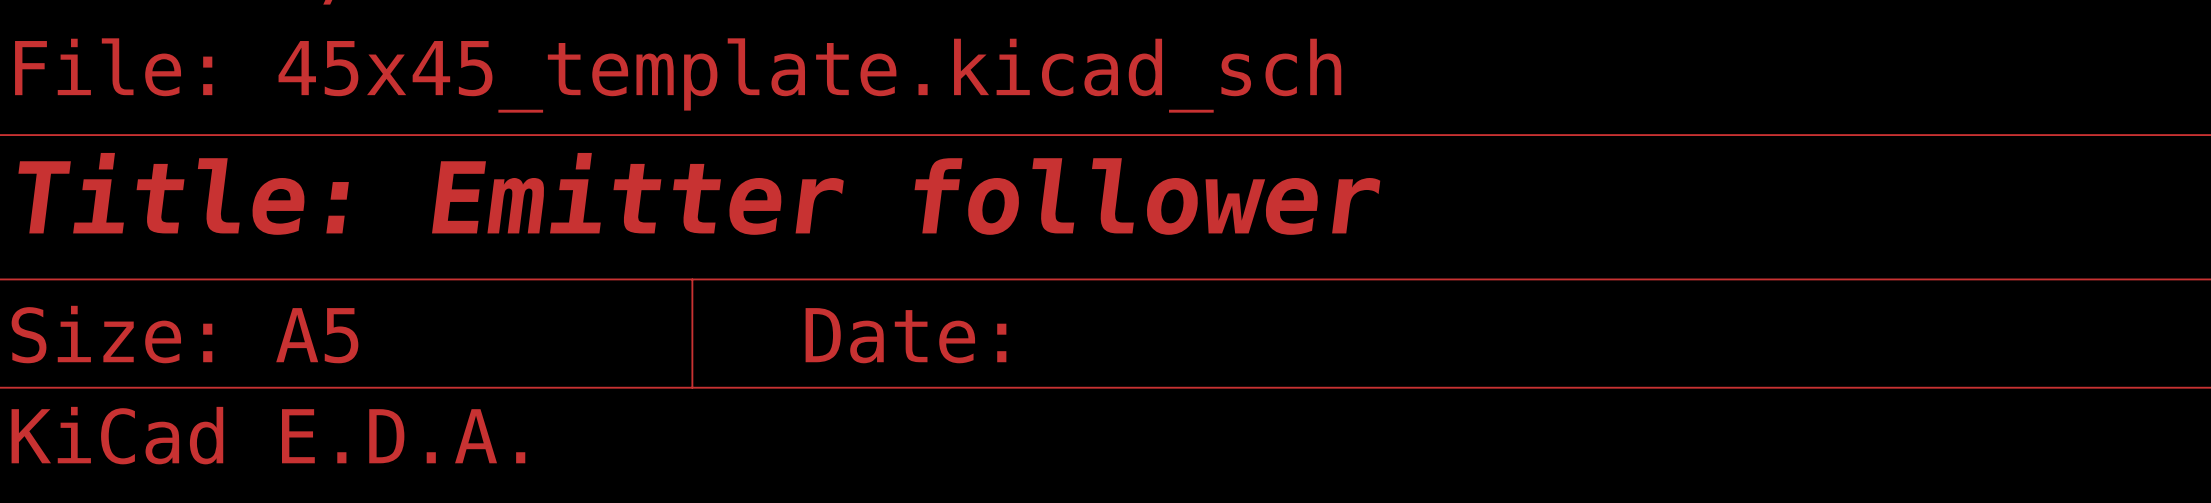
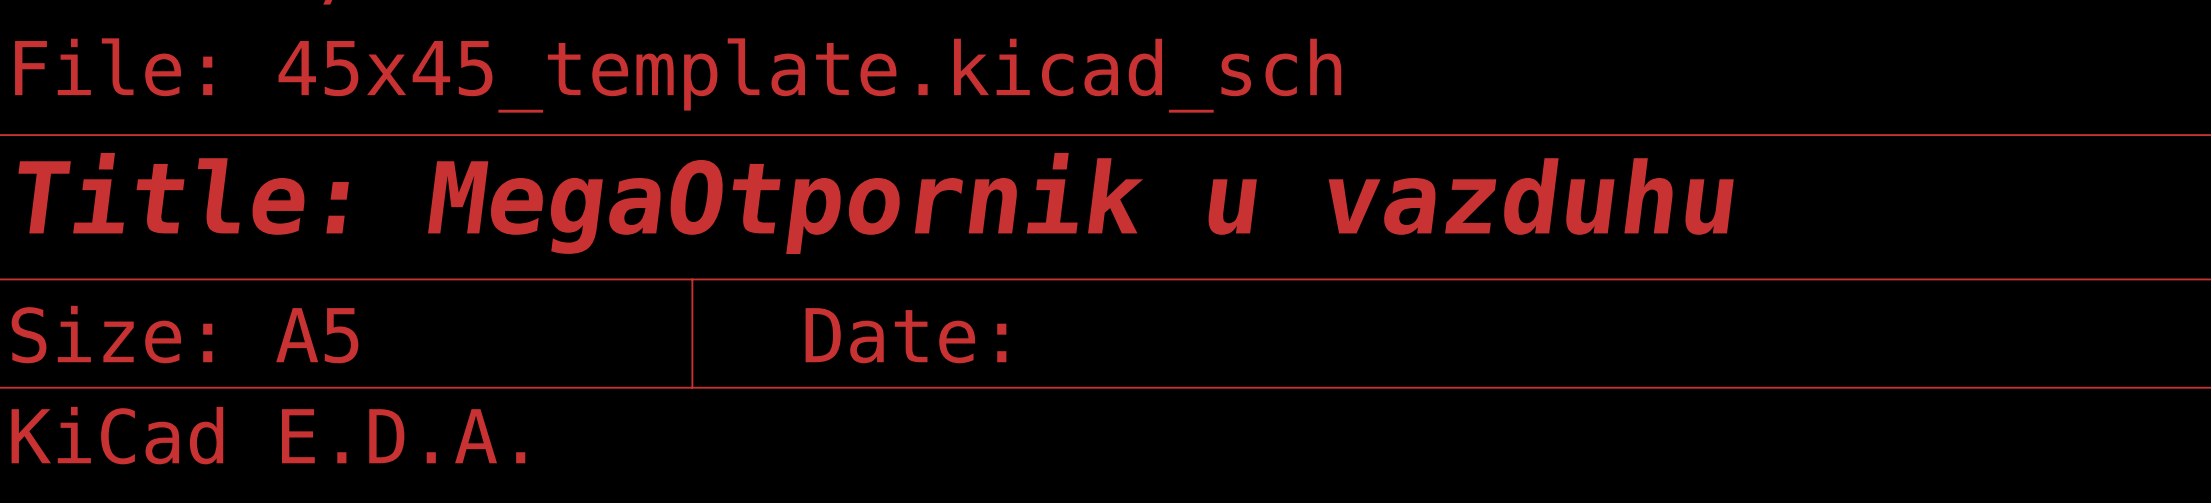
title block: Title: Emitter follower (699, 193) -> Title: MegaOtpornik u vazduhu (876, 203)

